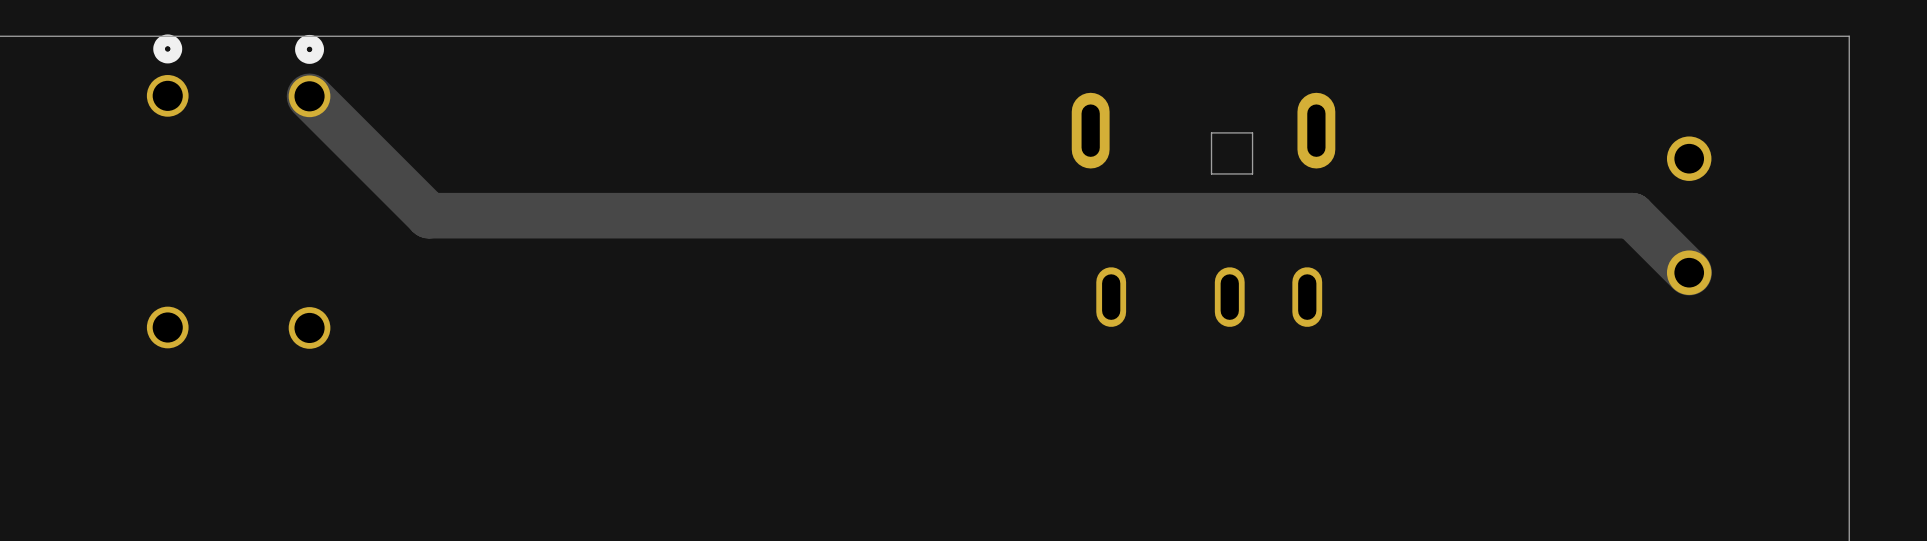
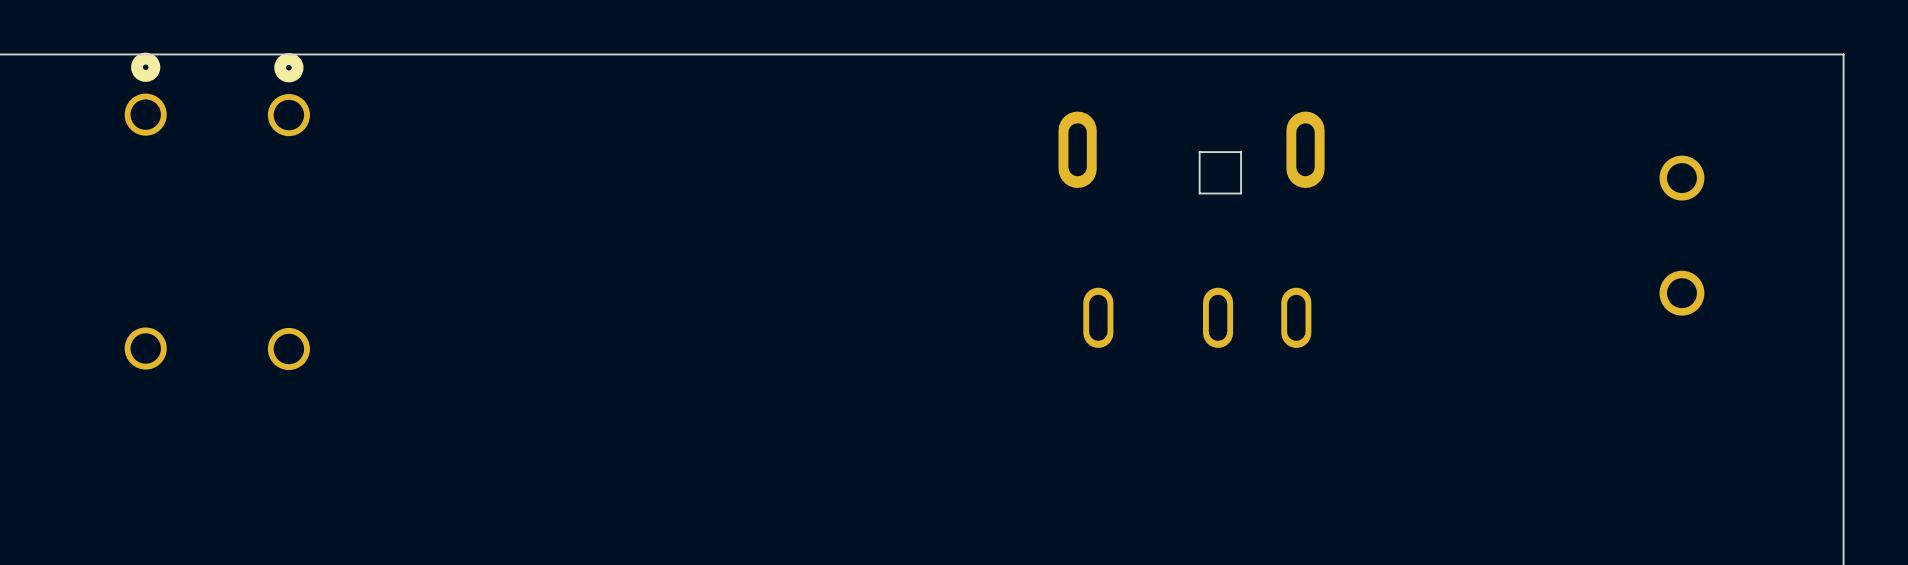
track: (309, 96) (428, 215) (1632, 215) (1689, 272) -> none

